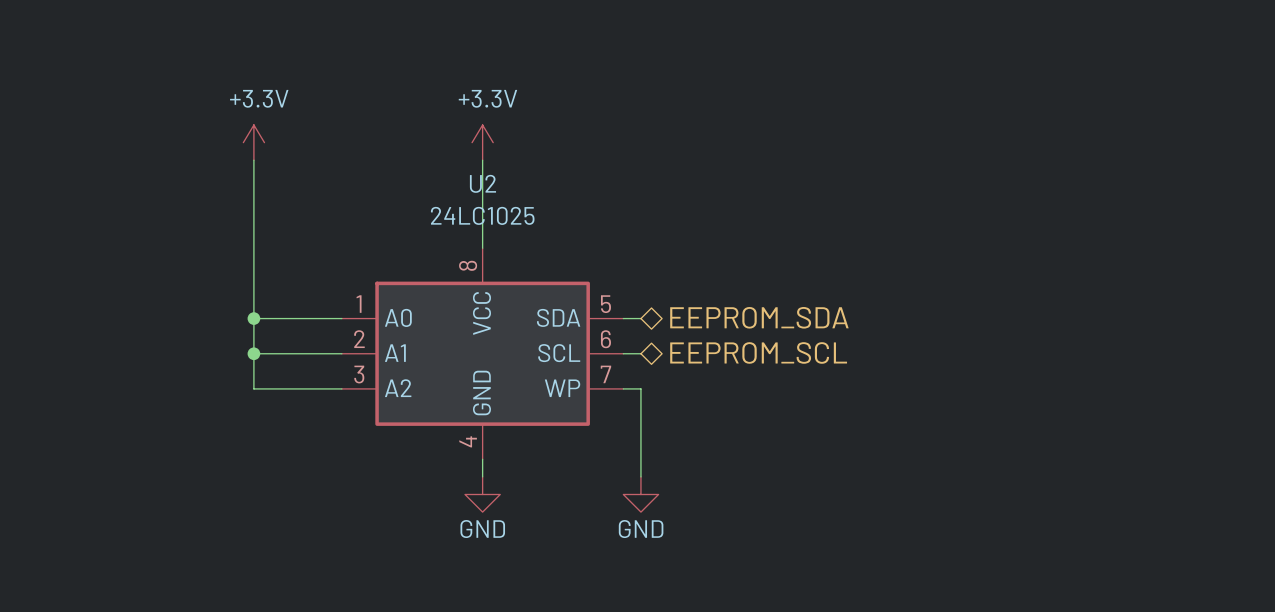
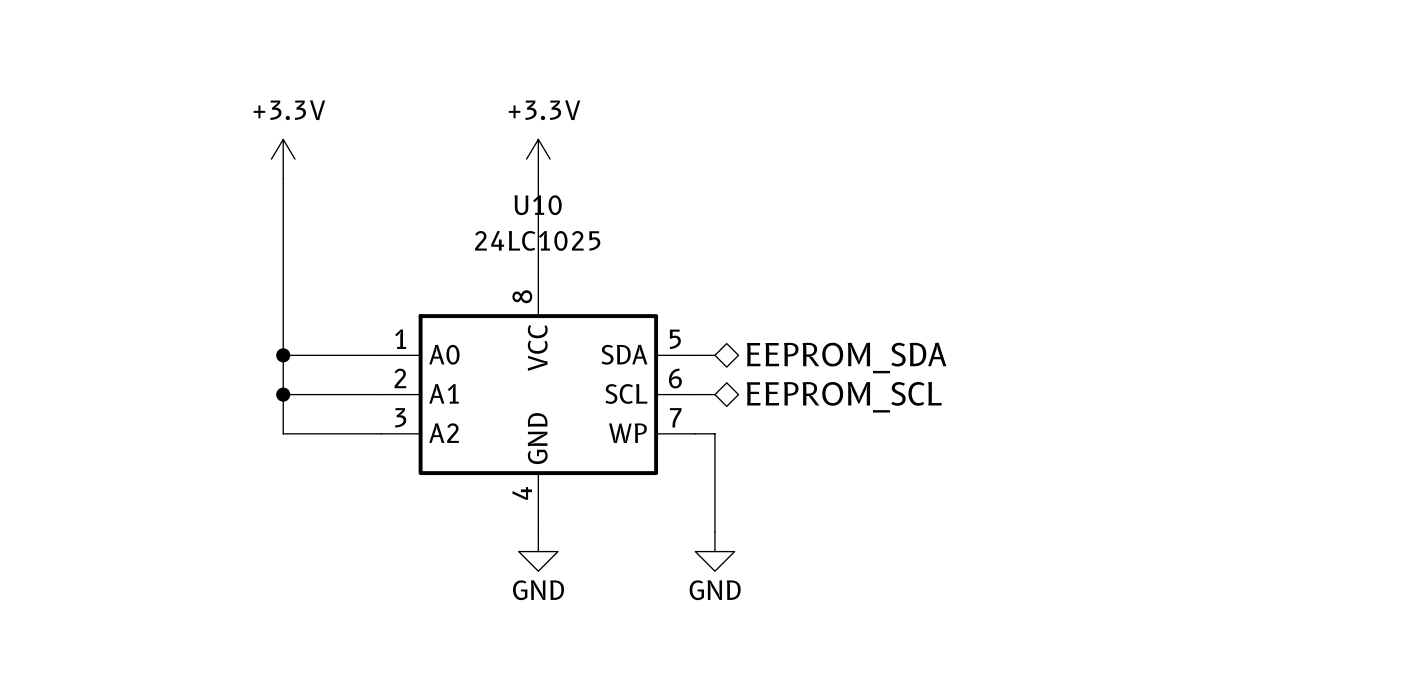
U2 name: U2 (482, 183) -> U10 (538, 205)

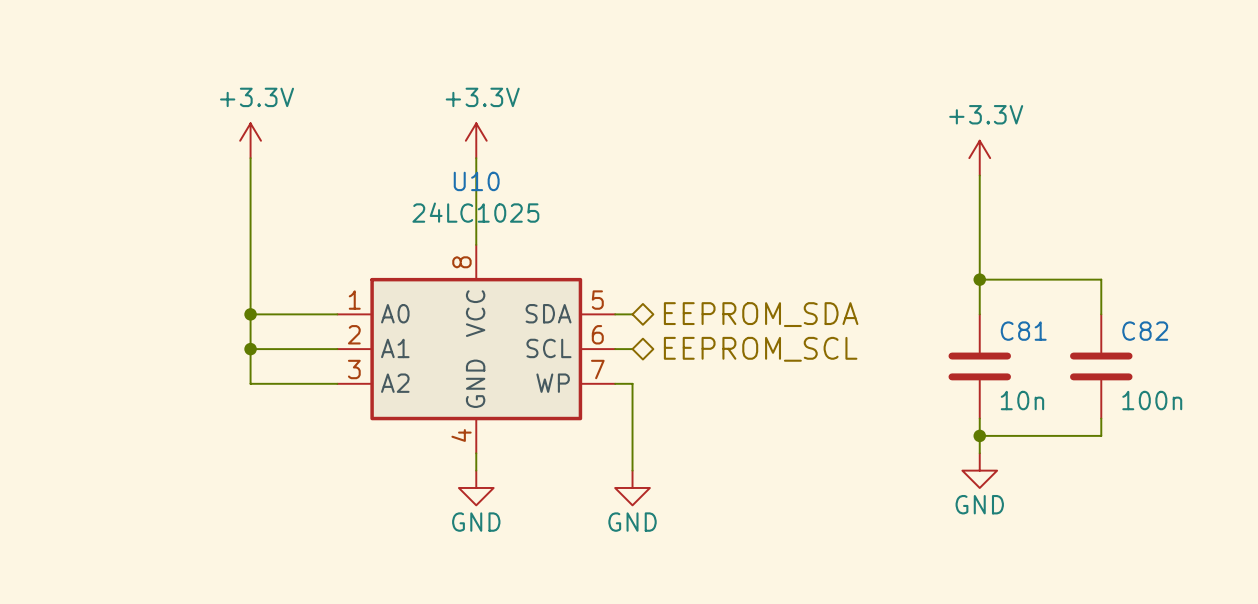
power symbol: none -> +3.3V (979, 158)
wire: none -> (979, 175) (979, 314)
wire: none -> (979, 279) (1101, 279) (1101, 314)
junction: none -> (979, 279)
C81: none -> 10n (979, 366)
C82: none -> 100n (1101, 366)
wire: none -> (979, 418) (979, 453)
wire: none -> (1101, 418) (1101, 435) (979, 435)
junction: none -> (979, 435)
power symbol: none -> GND (979, 470)

